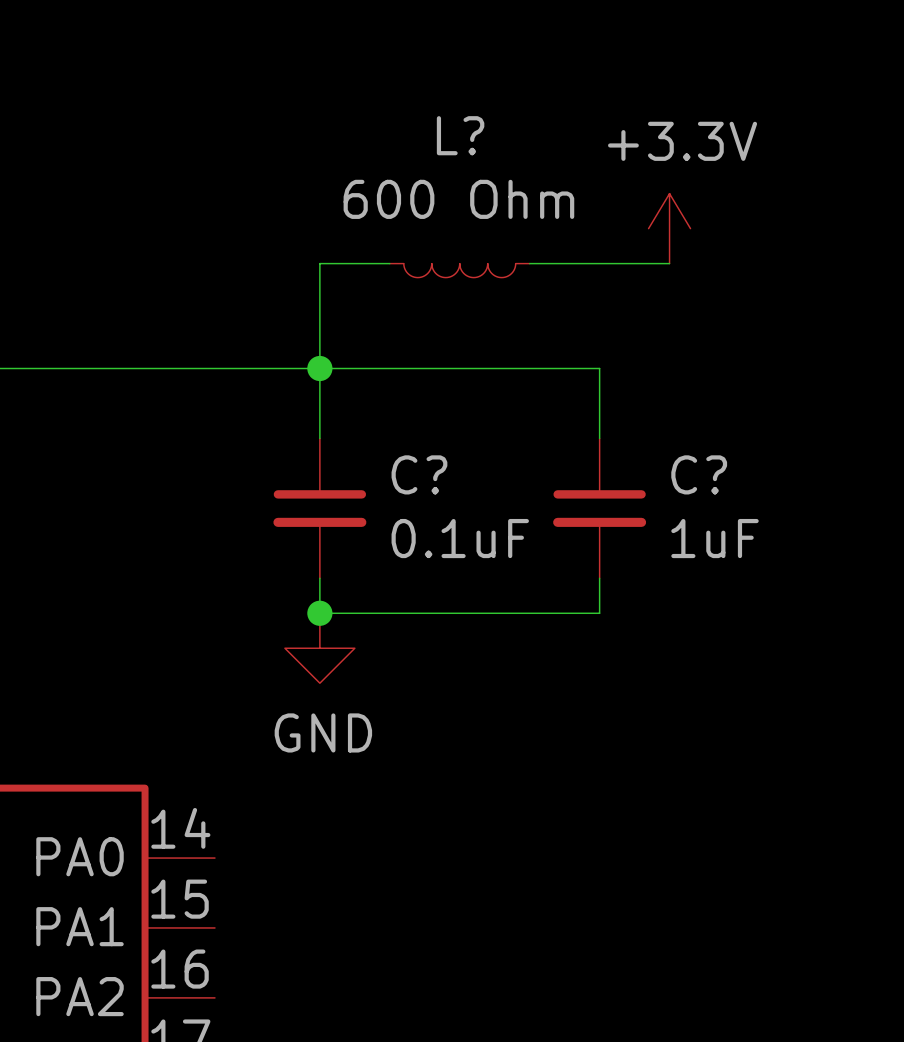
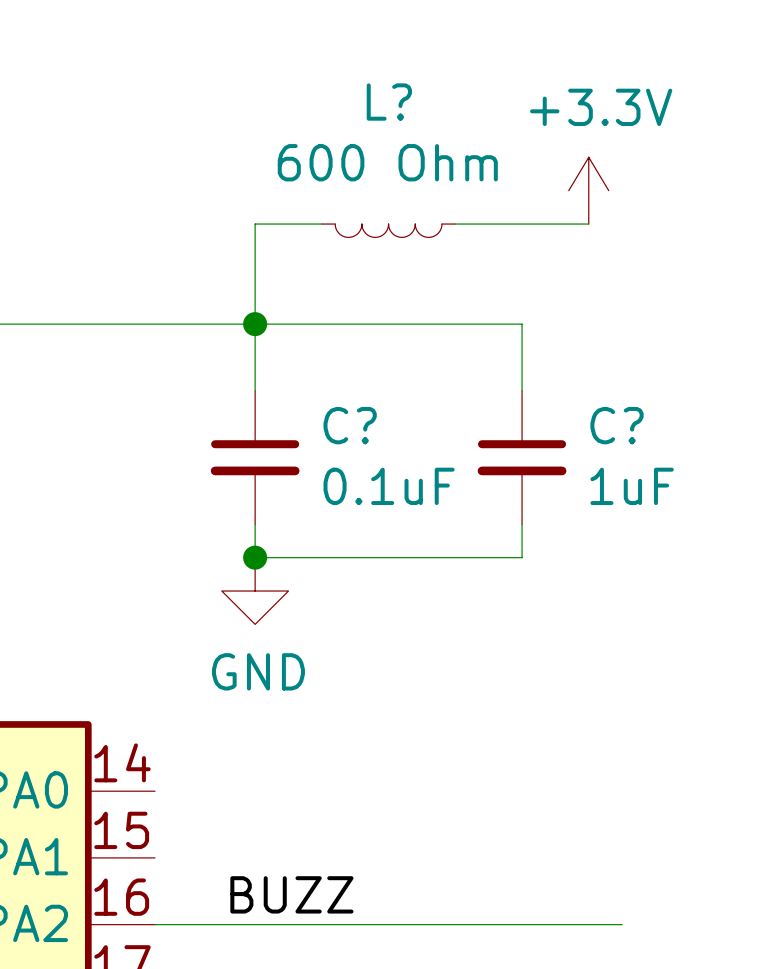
label: none -> BUZZ (291, 894)
wire: none -> (155, 924) (622, 924)

